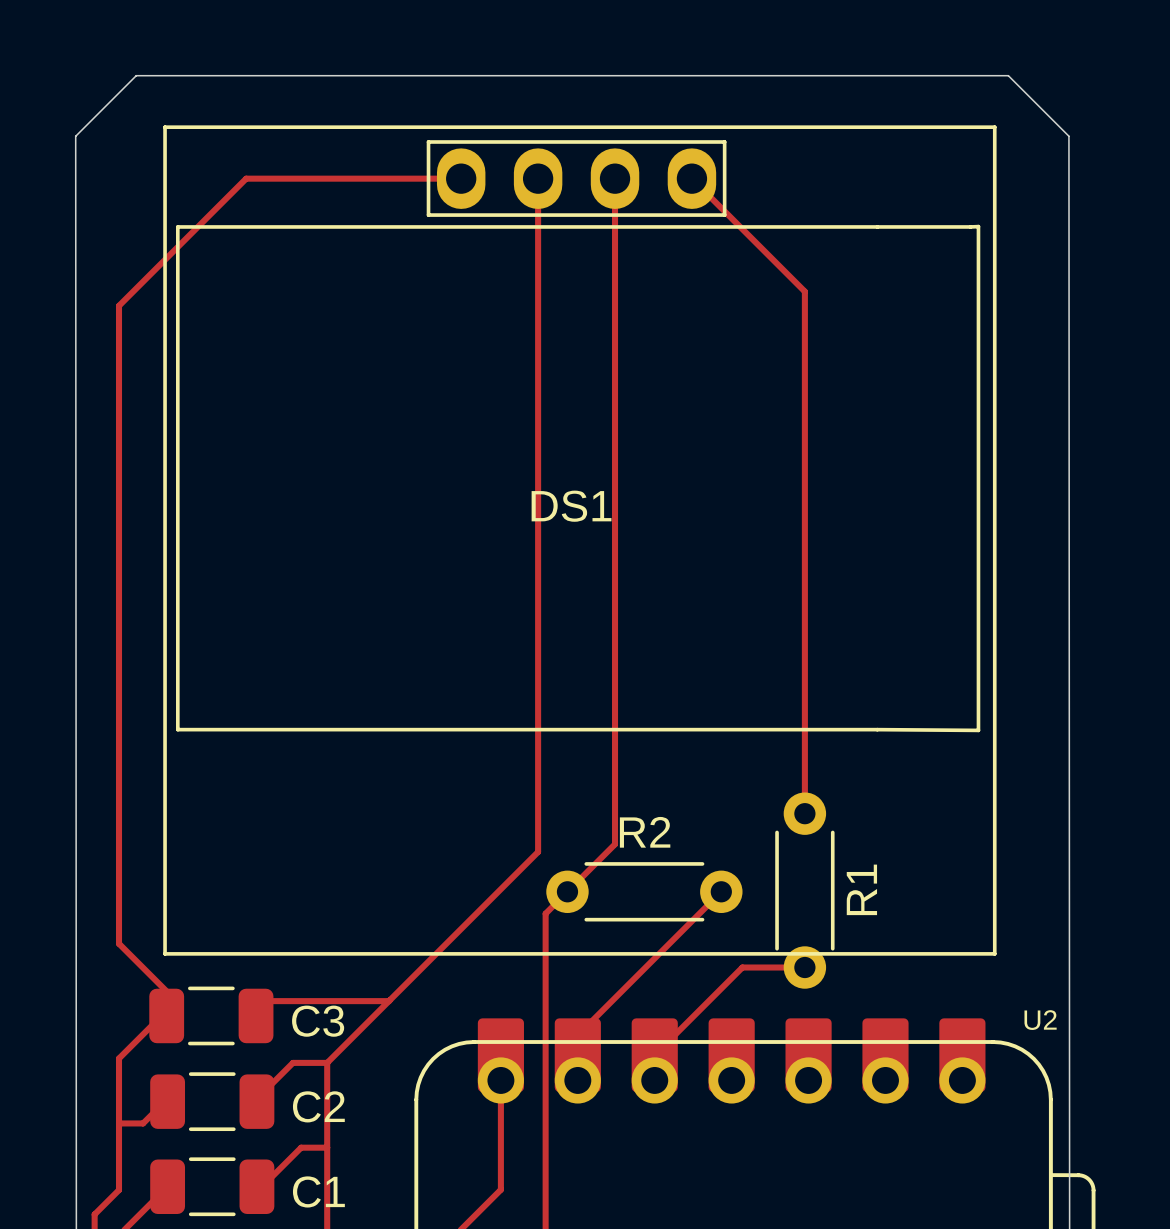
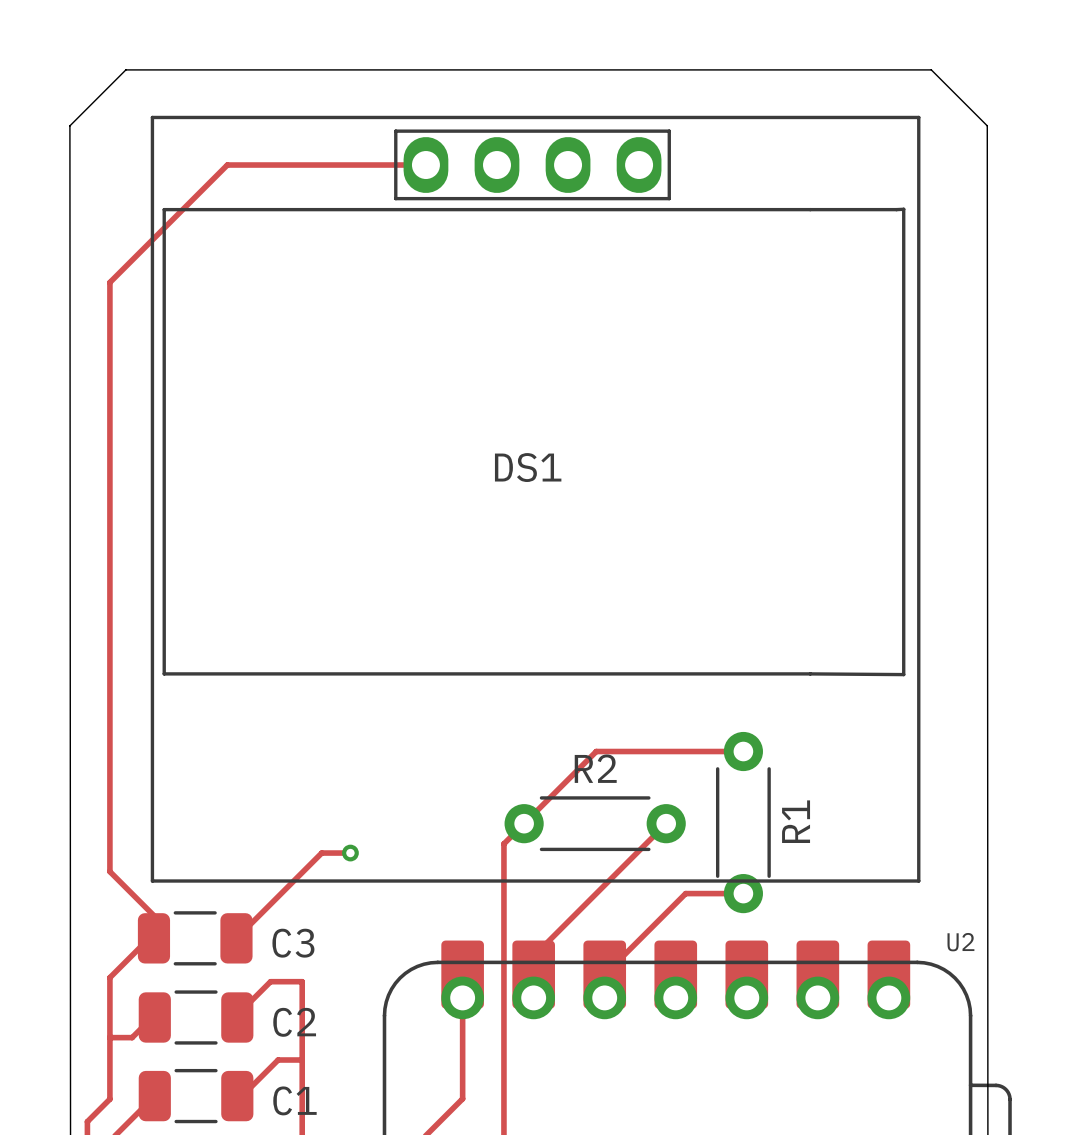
track: (538, 178) (538, 851) (327, 1062) -> none
track: (615, 178) (615, 844) -> (743, 751) (596, 751) (568, 779)
track: (691, 178) (804, 291) (804, 813) -> none
track: none -> (350, 853) (321, 853) (236, 938)
via: none -> (350, 853)
track: (265, 1001) (388, 1001) -> none

